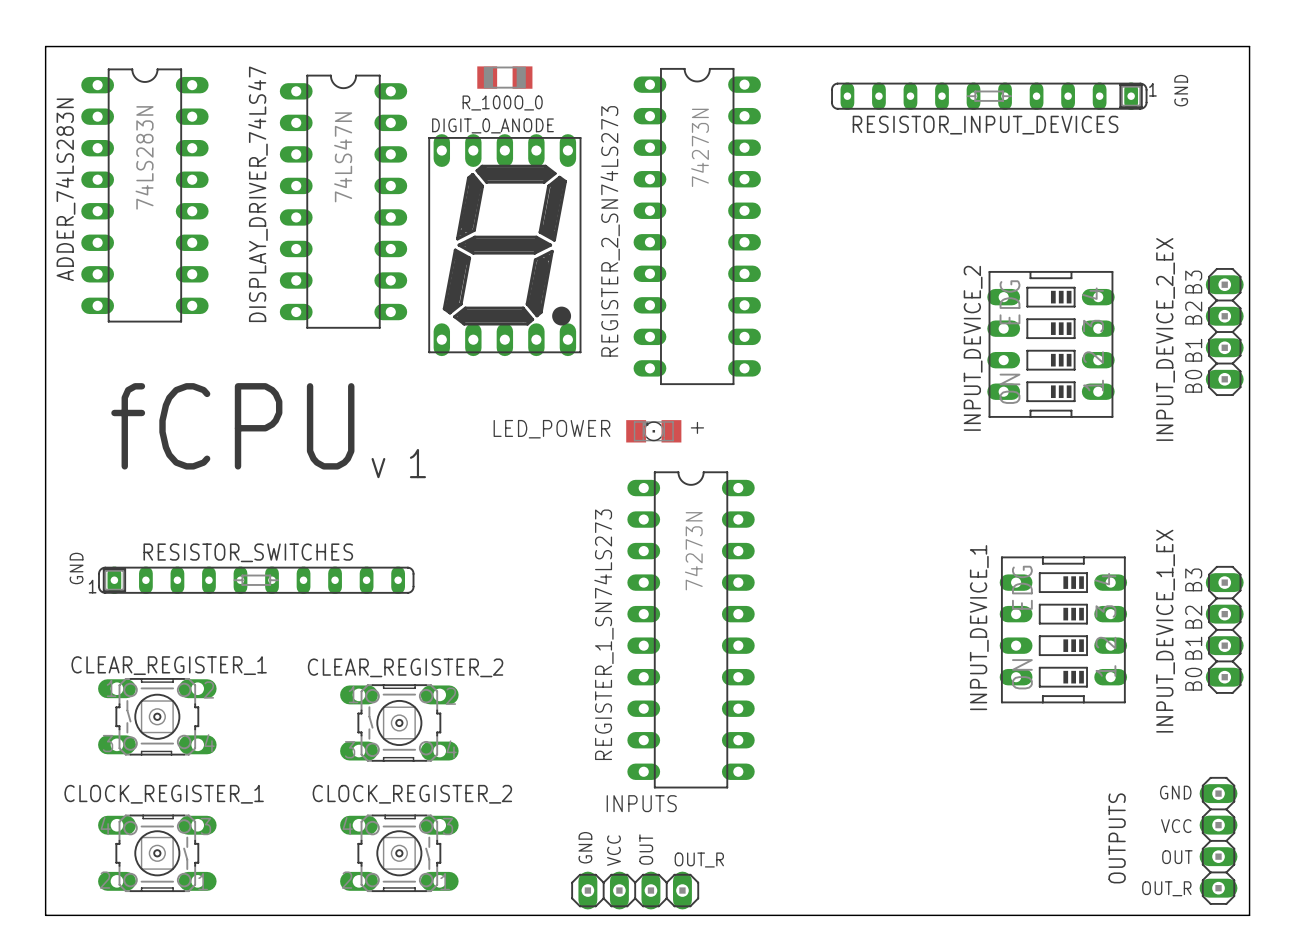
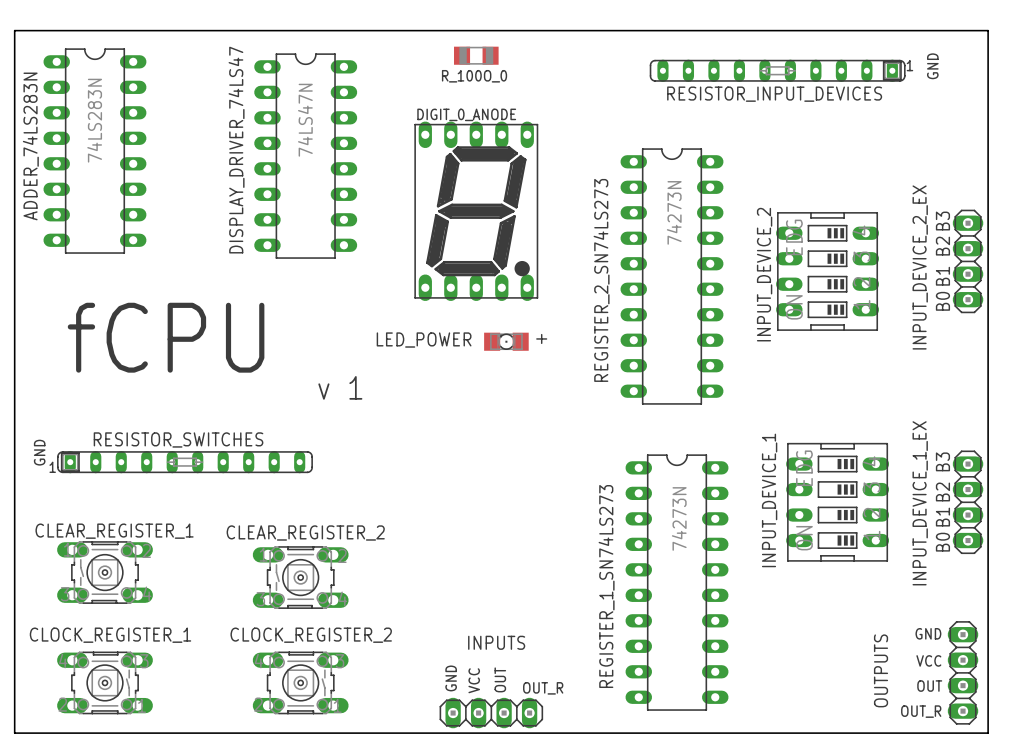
R_100O_0 position: (504, 77) -> (476, 55)
DISPLAY_DRIVER_74LS47 position: (343, 201) -> (305, 156)
REGISTER_2_SN74LS273 position: (697, 226) -> (671, 276)
DIGIT_0_ANODE position: (504, 245) -> (476, 211)
text position: v 1 (398, 463) -> v 1 (340, 387)
REGISTER_1_SN74LS273 position: (691, 629) -> (677, 582)

